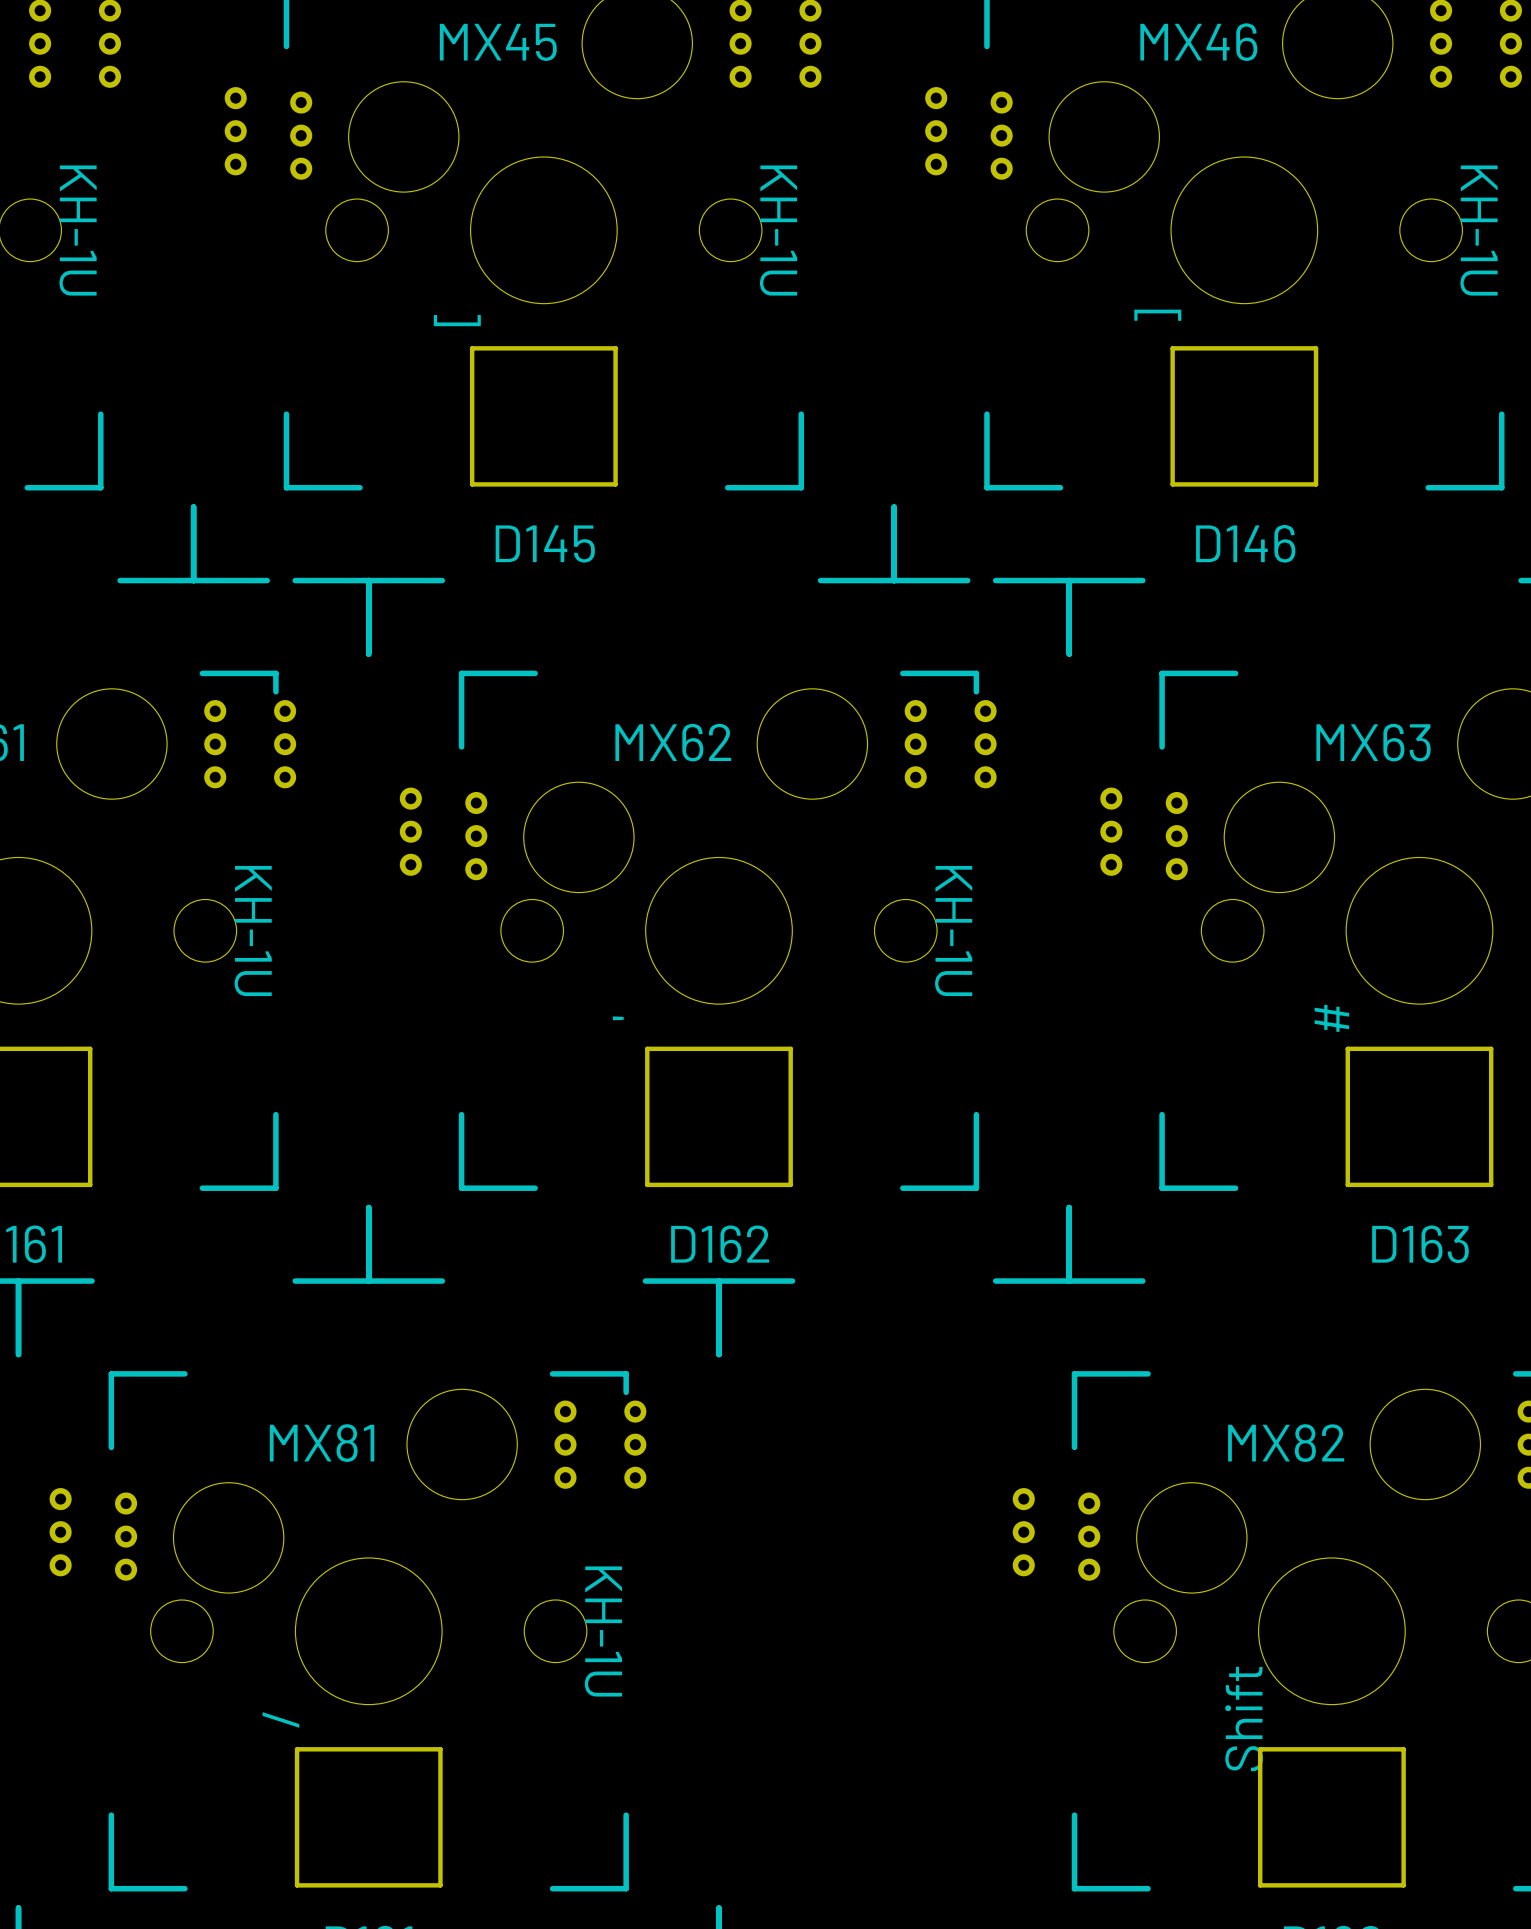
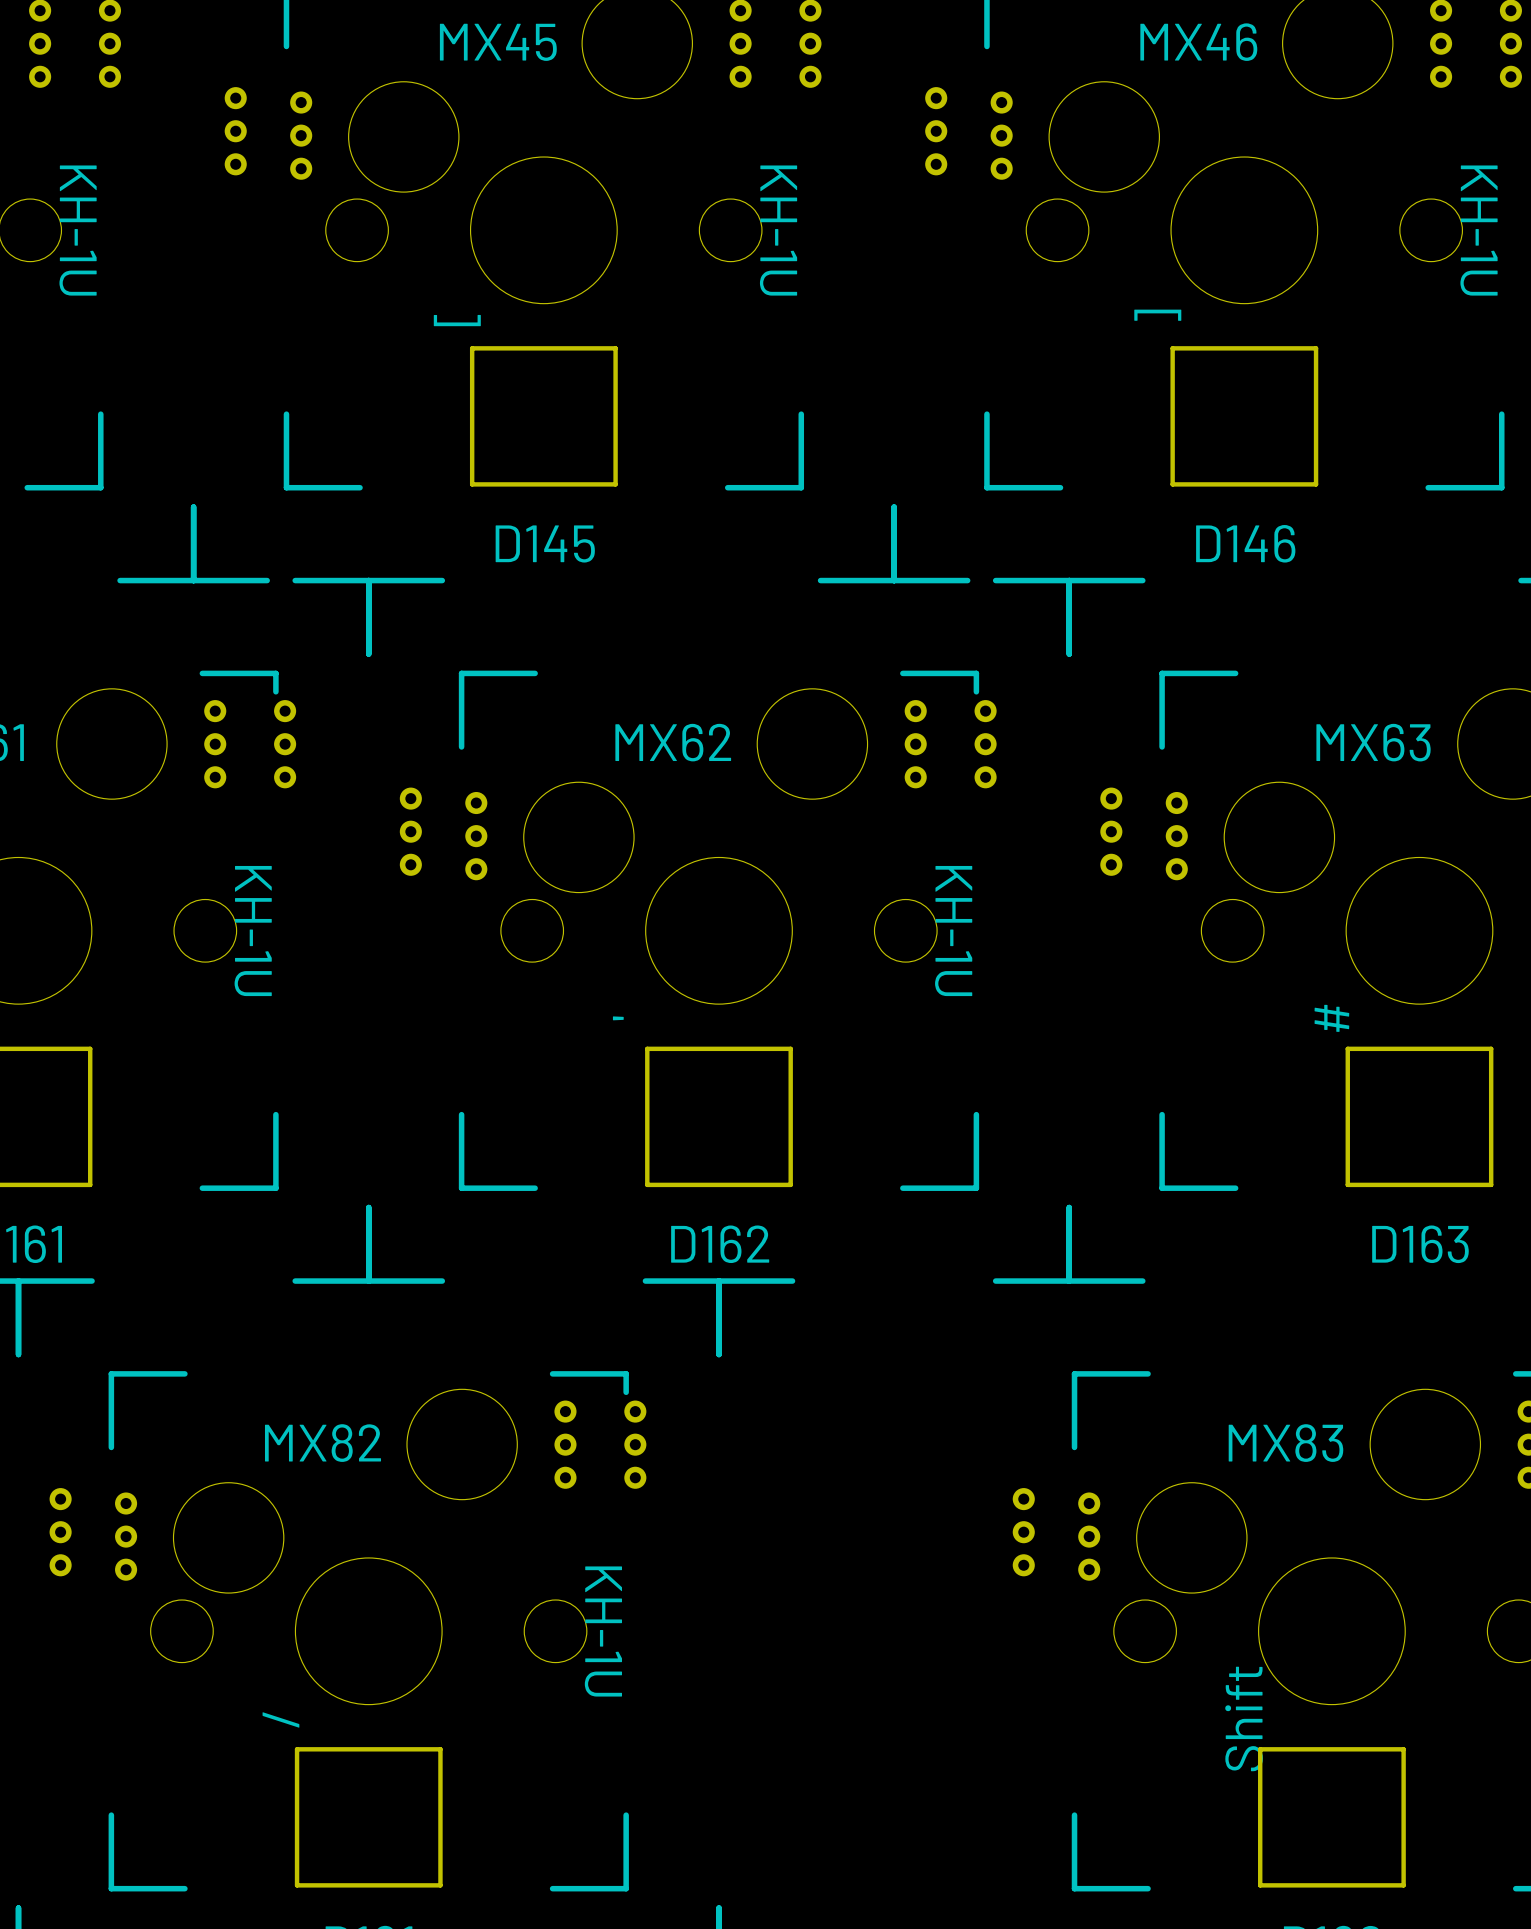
MX81 name: MX81 (322, 1443) -> MX82 (323, 1443)
MX82 name: MX82 (1286, 1443) -> MX83 (1285, 1443)

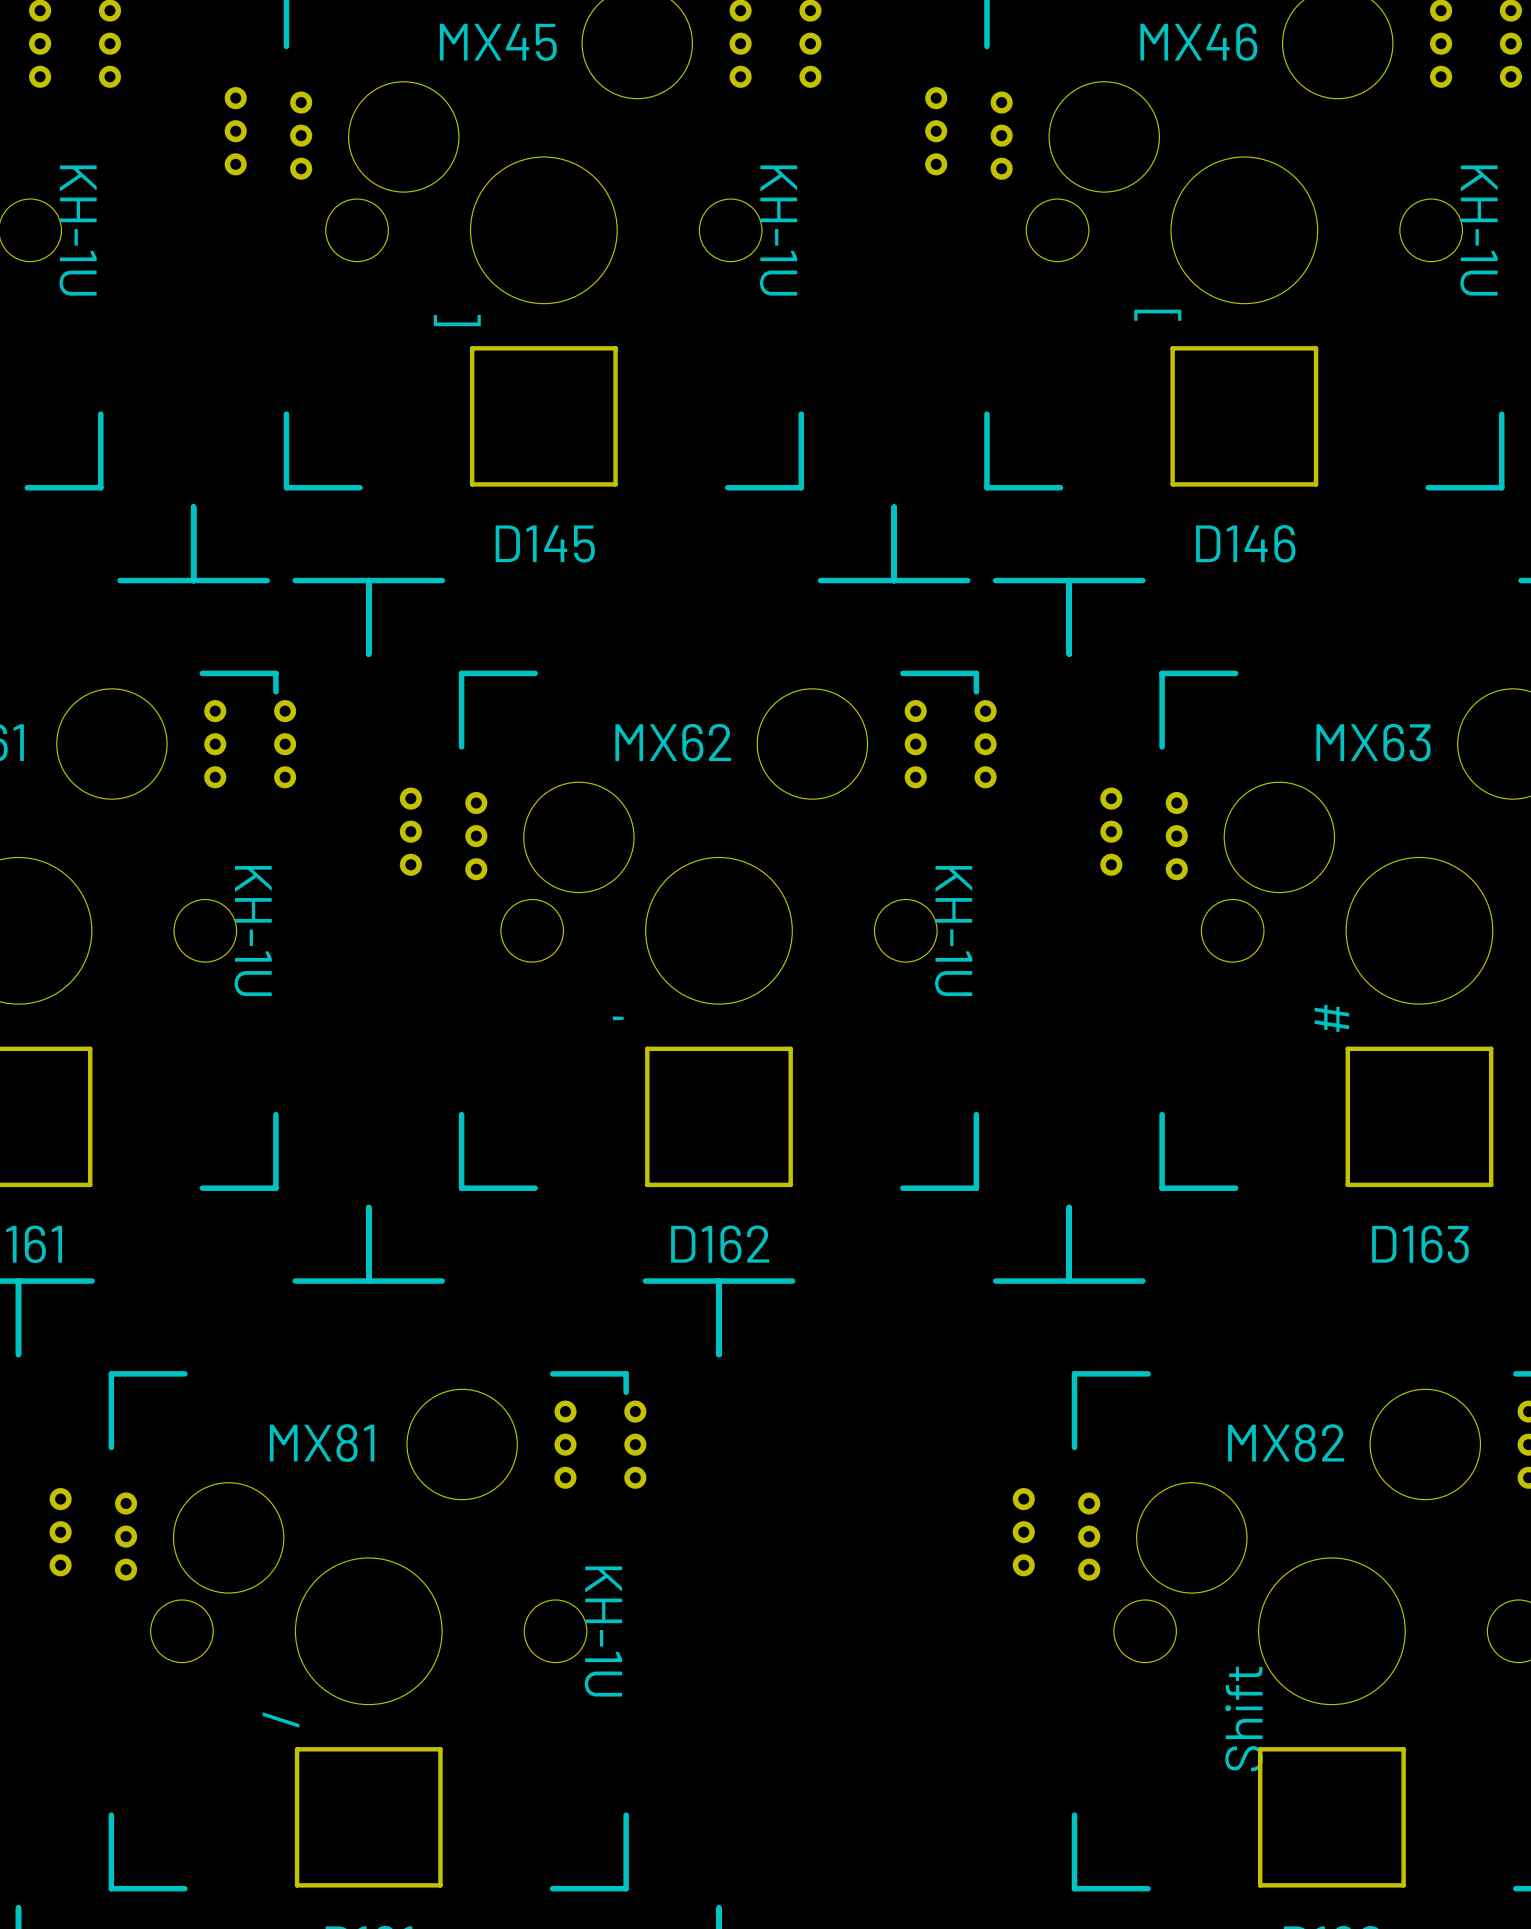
MX82 name: MX82 (323, 1443) -> MX81 (322, 1443)
MX83 name: MX83 (1285, 1443) -> MX82 (1286, 1443)

